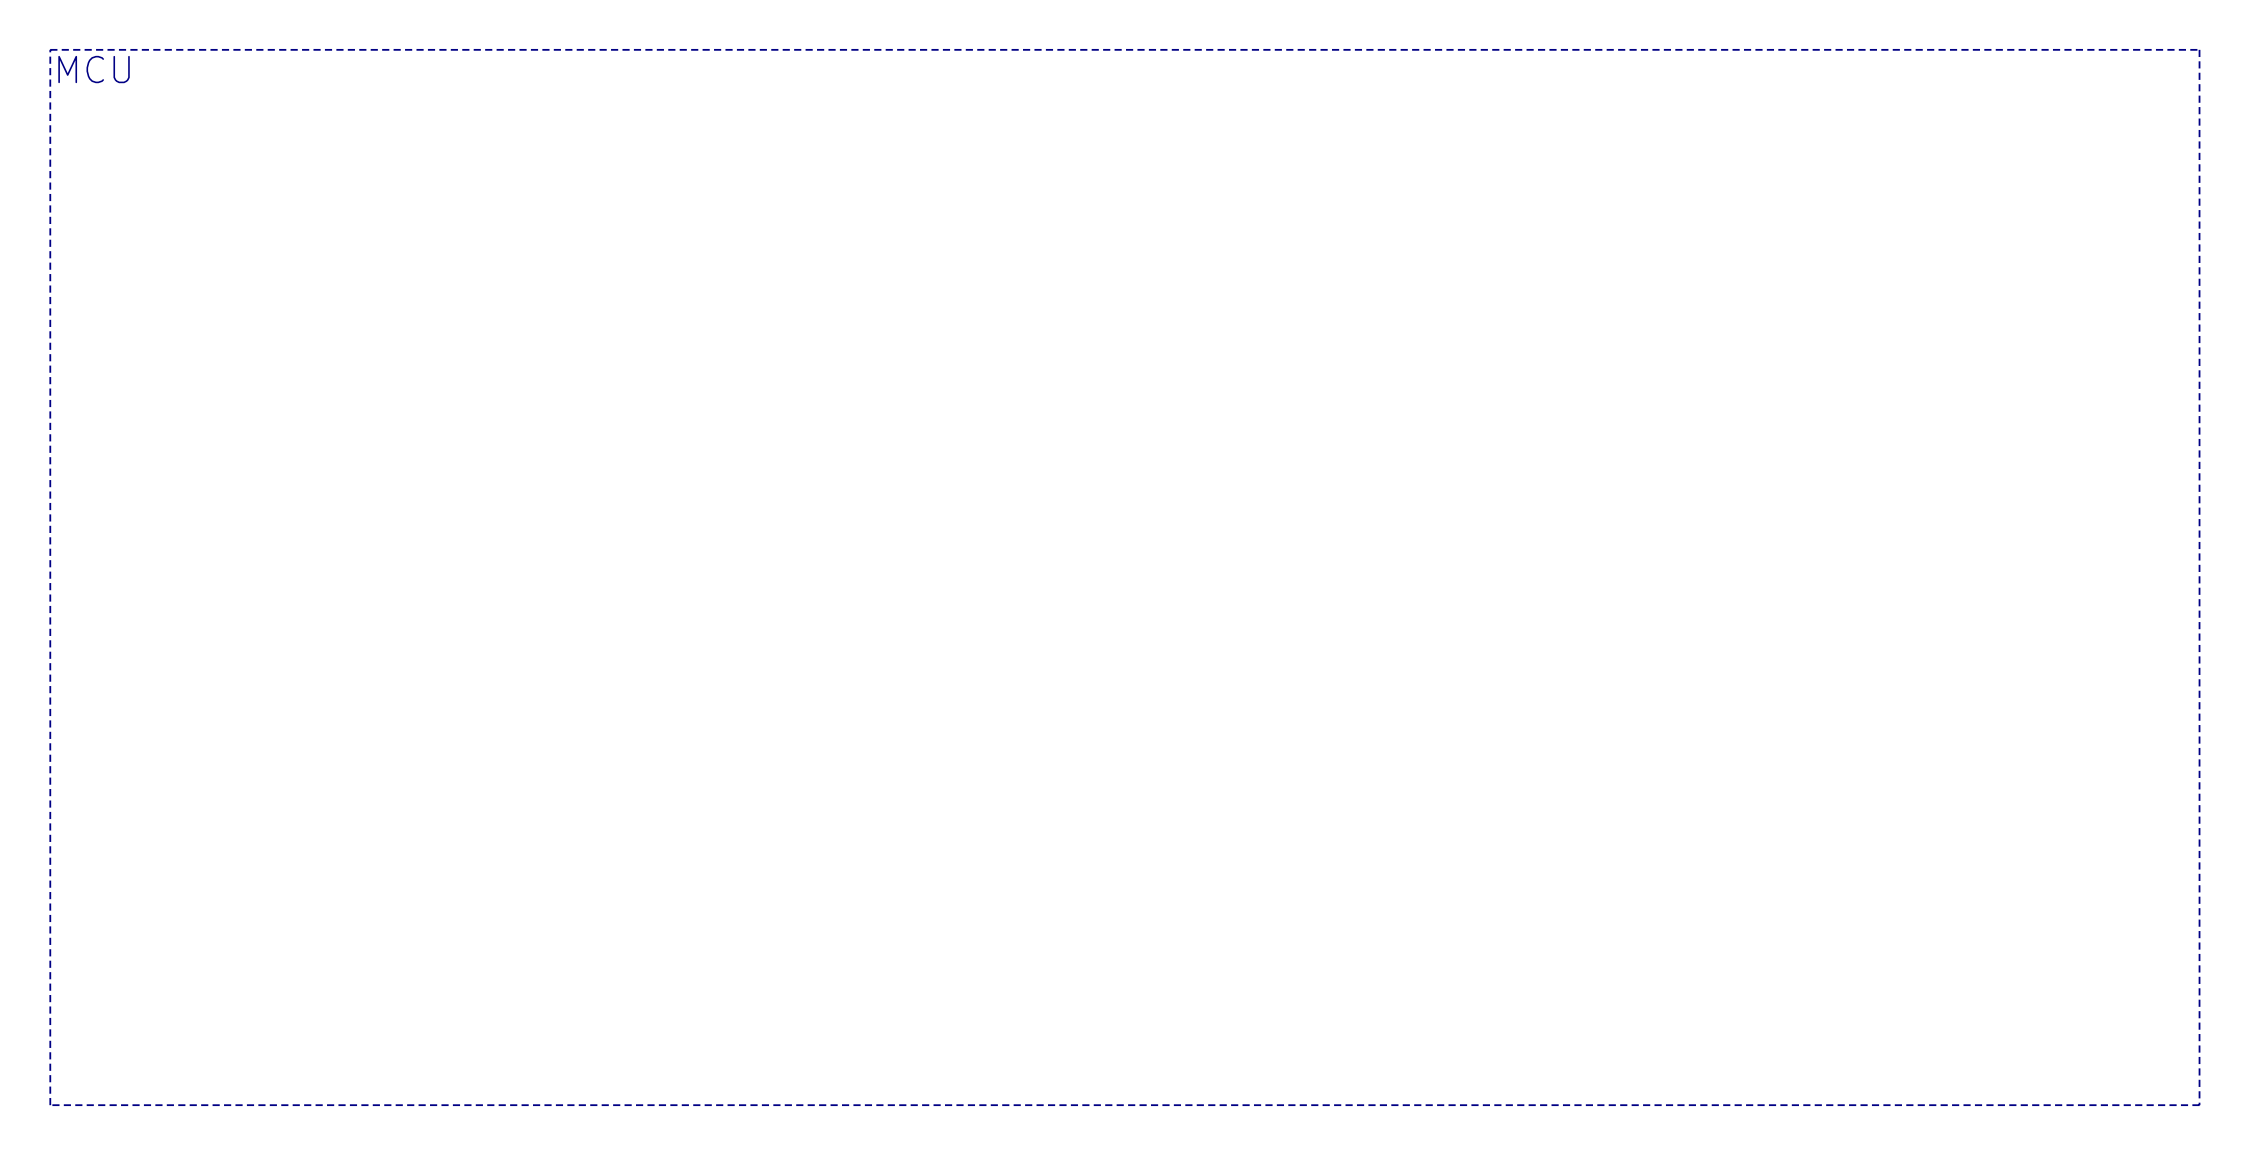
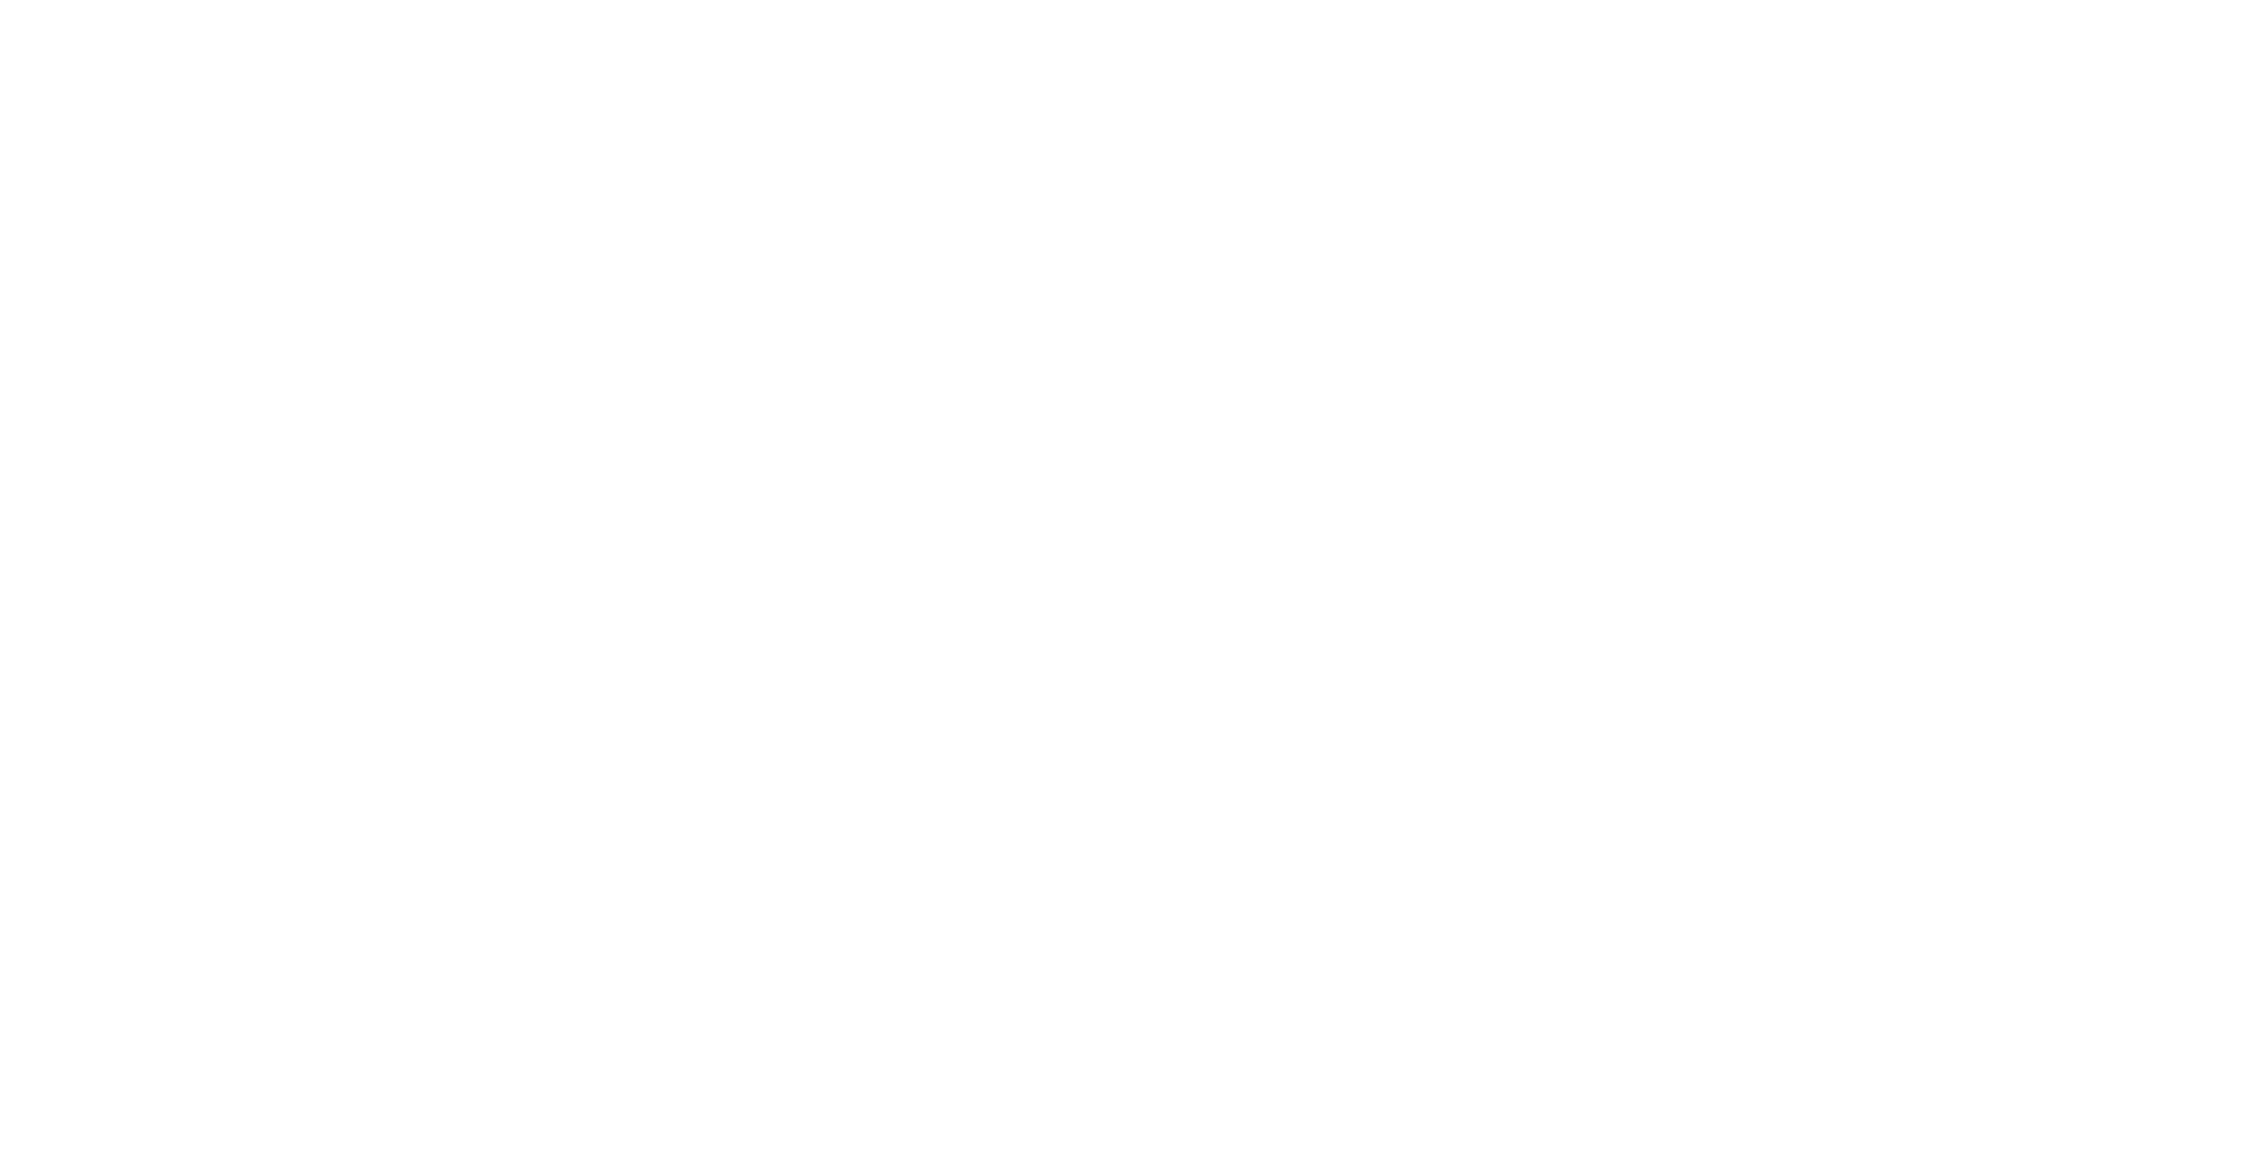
line: (50, 49) (2199, 49) (2199, 1105) (50, 1105) (50, 49) -> none
text: MCU (94, 69) -> none

